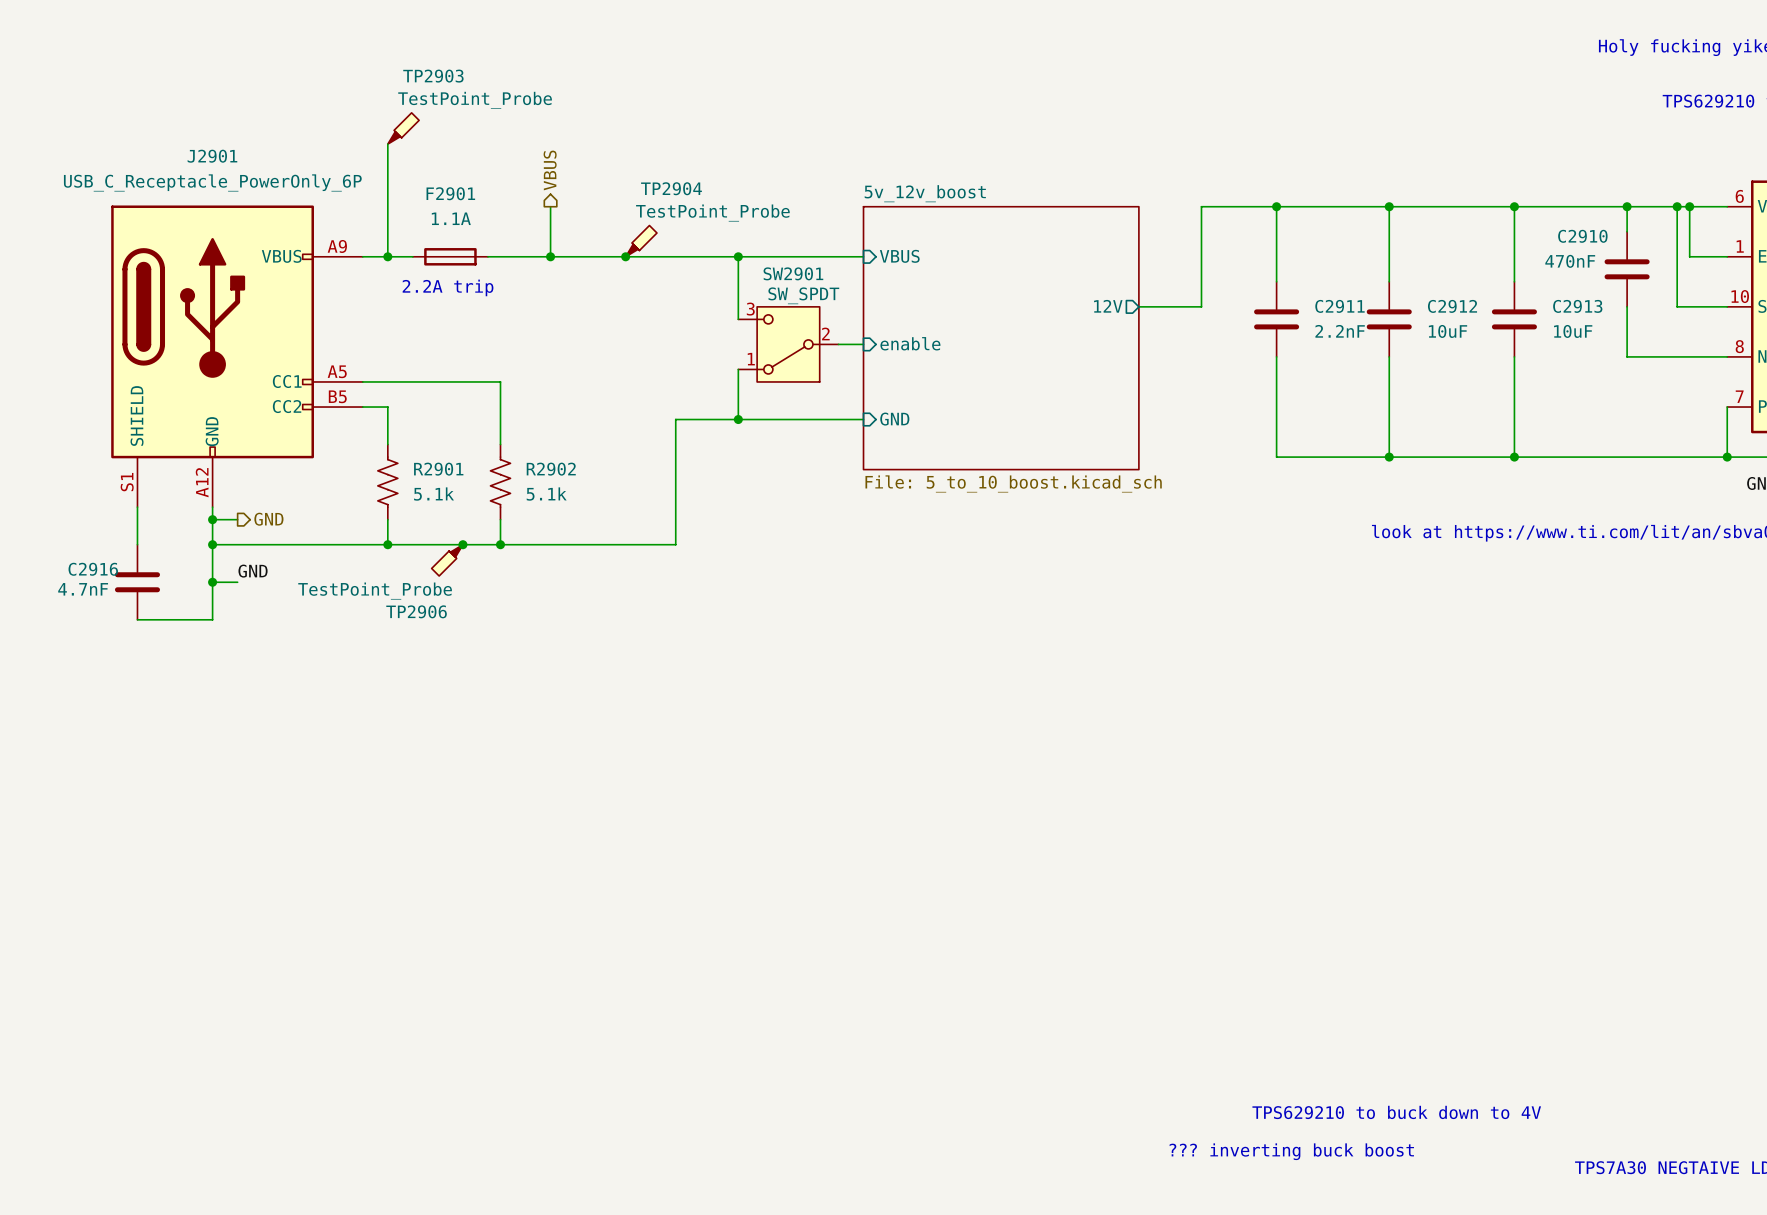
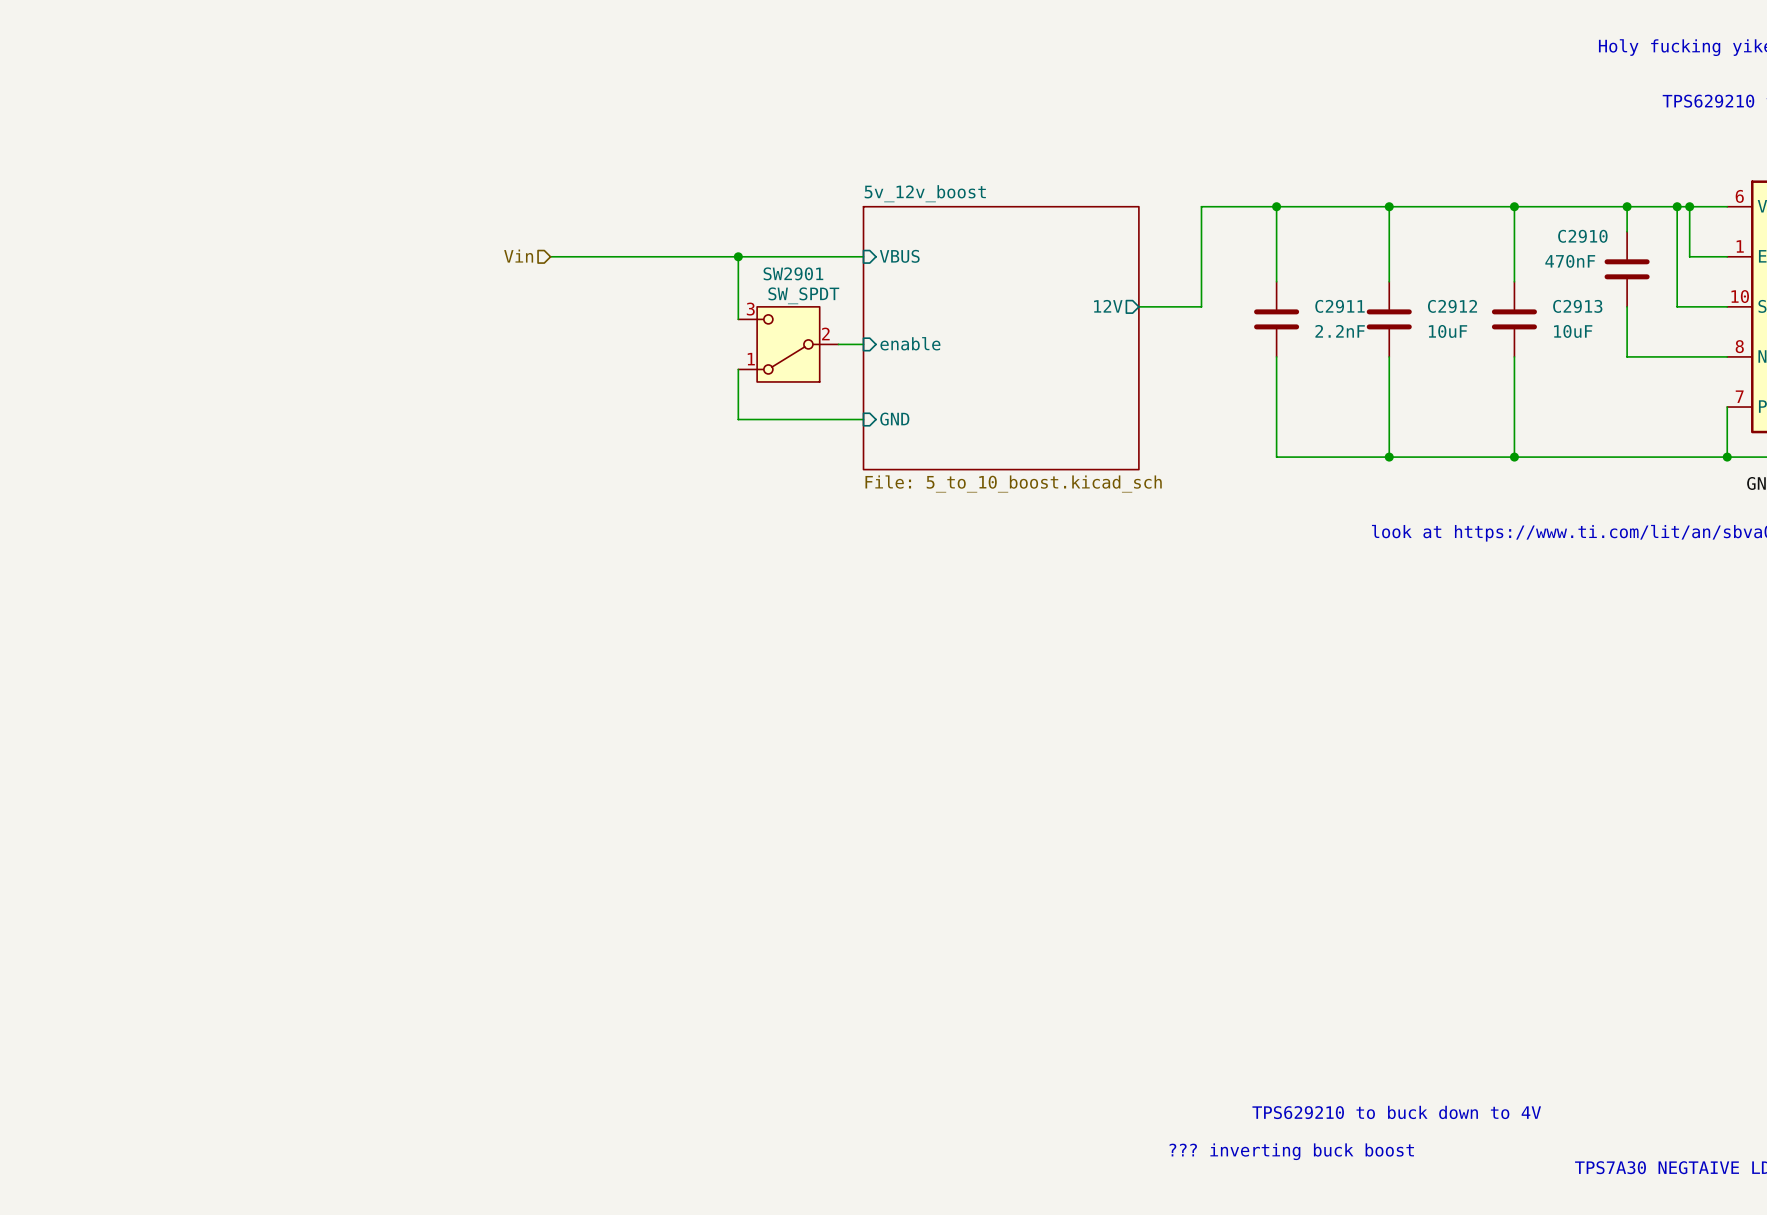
TP2903: TestPoint_Probe (403, 128) -> none
wire: (387, 144) (387, 256) -> none
hierarchical label: VBUS (550, 170) -> none
wire: (550, 206) (550, 256) (487, 256) -> none
TP2904: TestPoint_Probe (641, 241) -> none
wire: (362, 256) (412, 256) -> none
junction: (387, 256) -> none
F2901: 1.1A (450, 256) -> none
hierarchical label: none -> Vin (518, 256)
junction: (550, 256) -> none
junction: (625, 256) -> none
text: 2.2A trip (448, 287) -> none
J2901: USB_C_Receptacle_PowerOnly_6P (237, 356) -> none
wire: (362, 381) (500, 381) (500, 444) -> none
wire: (362, 407) (387, 407) (387, 444) -> none
wire: (738, 419) (675, 419) (675, 544) (212, 544) -> none
junction: (738, 419) -> none
R2901: 5.1k (387, 482) -> none
R2902: 5.1k (500, 482) -> none
wire: (137, 507) (137, 544) -> none
wire: (212, 507) (212, 619) (137, 619) -> none
wire: (212, 519) (237, 519) -> none
junction: (212, 519) -> none
hierarchical label: GND (268, 519) -> none
wire: (387, 519) (387, 544) -> none
wire: (500, 519) (500, 544) -> none
junction: (212, 544) -> none
junction: (387, 544) -> none
junction: (462, 544) -> none
junction: (500, 544) -> none
TP2906: TestPoint_Probe (447, 560) -> none
label: GND (253, 571) -> none
C2916: 4.7nF (137, 582) -> none
wire: (212, 582) (237, 582) -> none
junction: (212, 582) -> none

